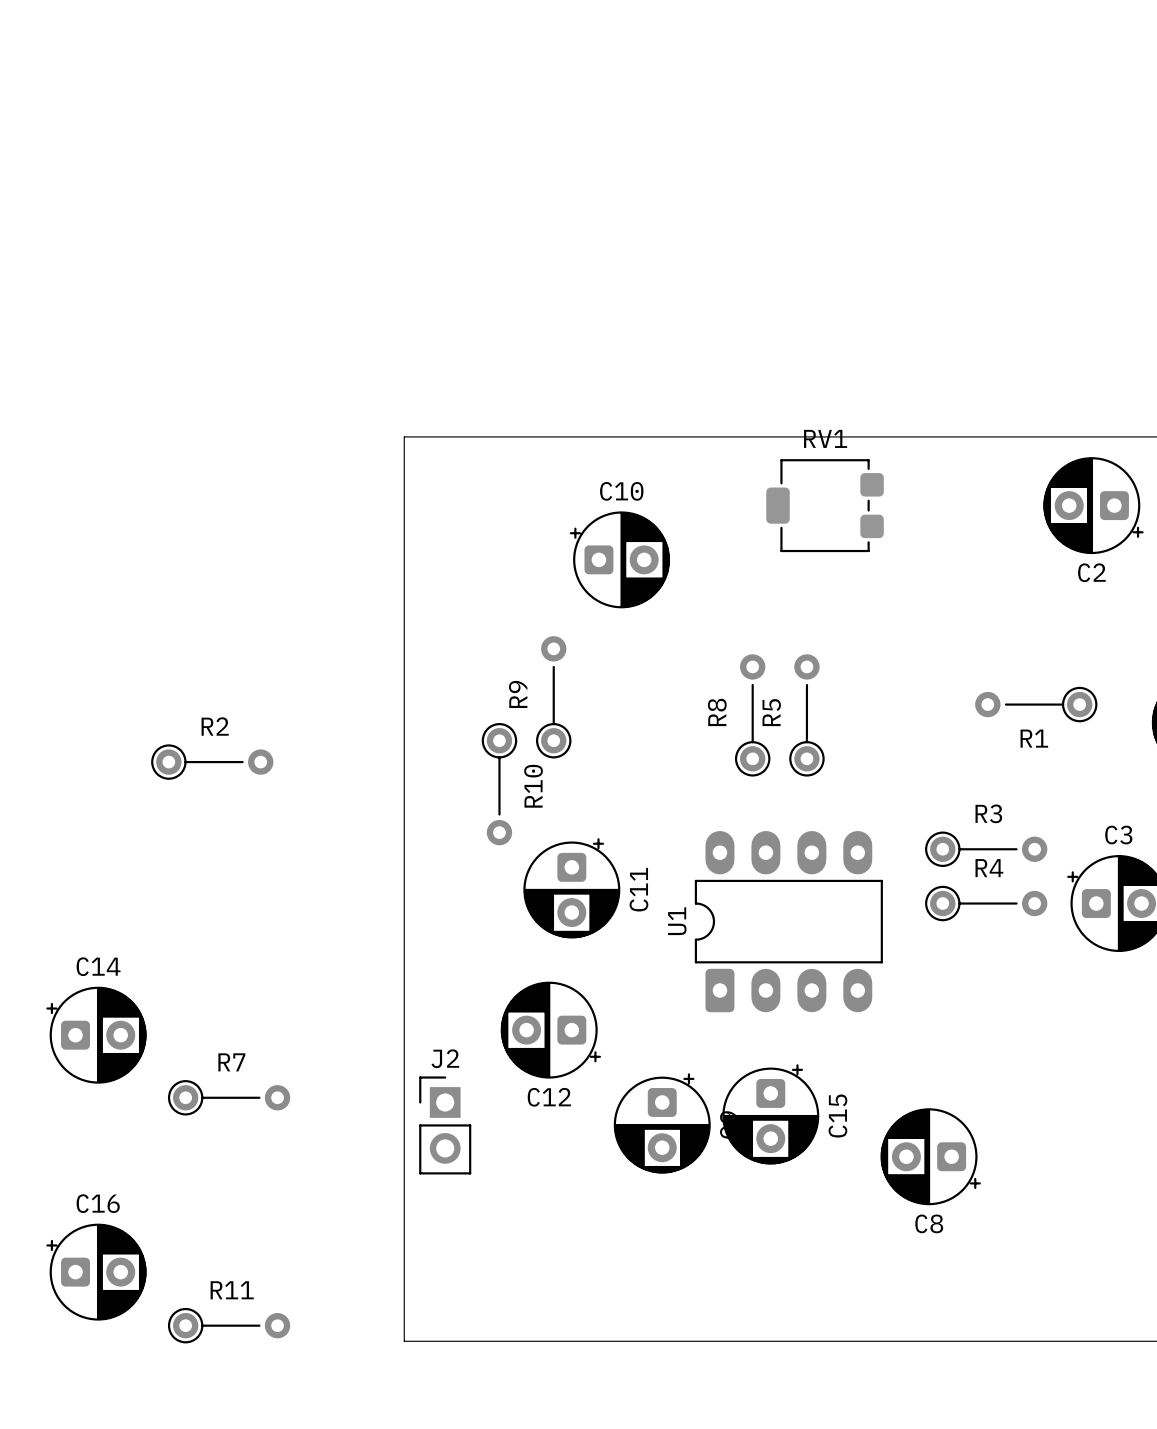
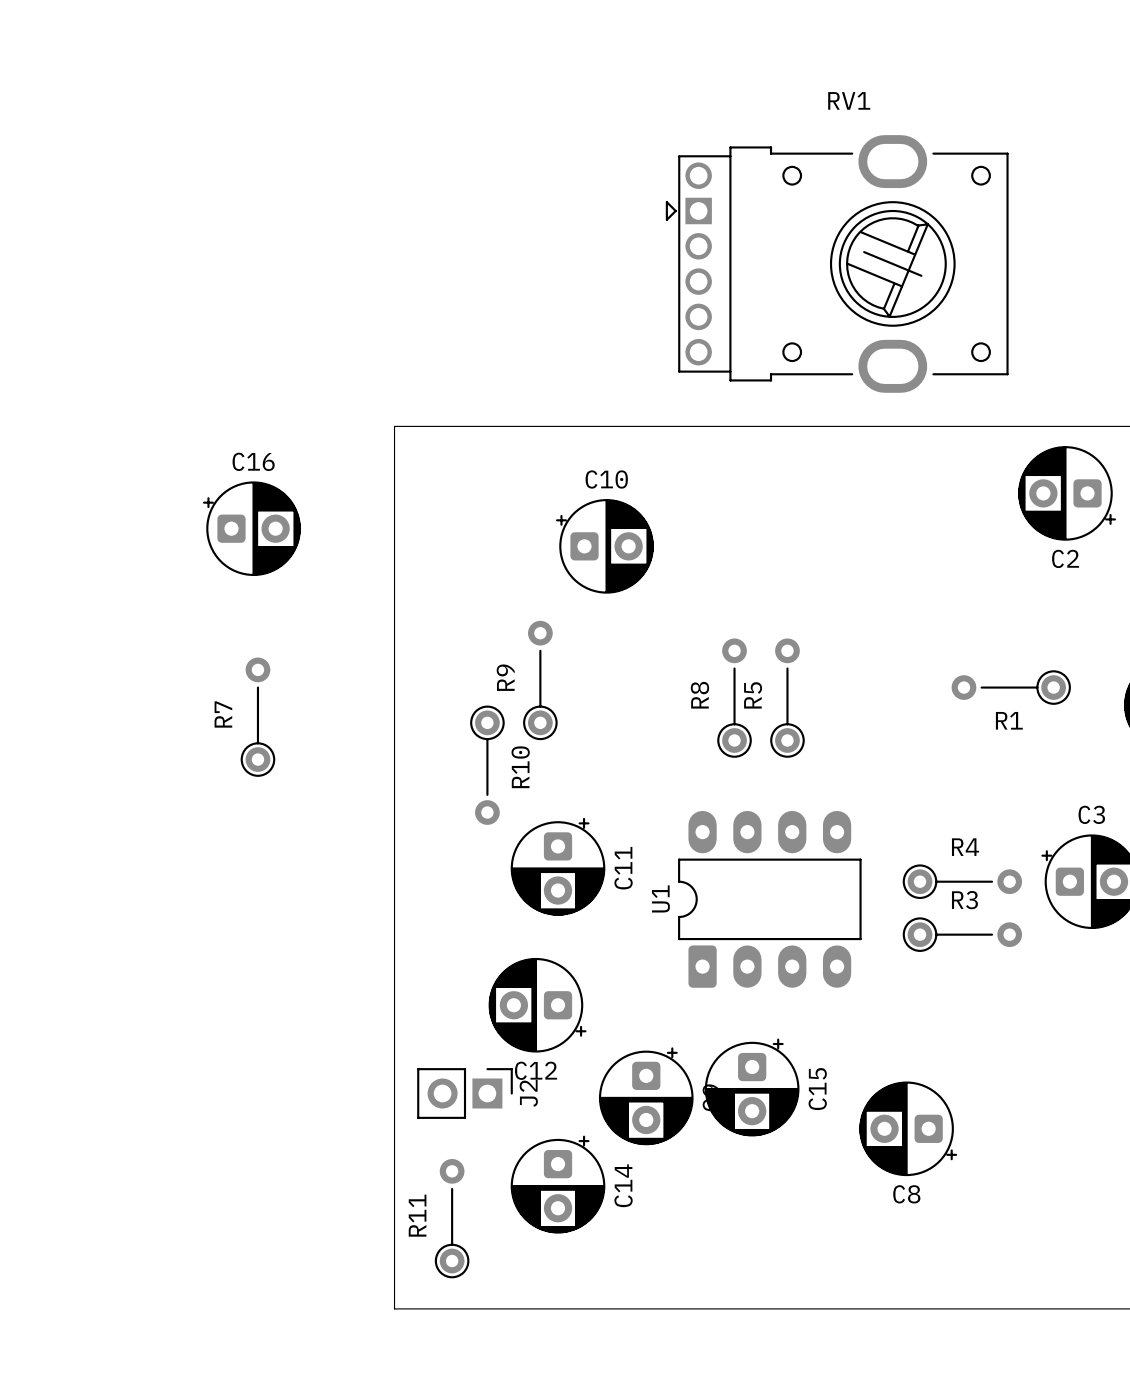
RV1 name position: RV1 (825, 438) -> RV1 (849, 100)
RV1 footprint: [766, 459, 884, 553] -> [665, 135, 1009, 393]
R2: (212, 762) -> none
R3 position: (986, 849) -> (962, 934)
C14 rotation: 0° (96, 1035) -> 90° clockwise (558, 1184)
C14 position: (96, 1035) -> (558, 1184)
R7 rotation: 0° (229, 1097) -> 90° counterclockwise (257, 717)
R7 position: (229, 1097) -> (257, 717)
J2 rotation: 0° (445, 1125) -> 90° clockwise (465, 1093)
C16 position: (96, 1272) -> (251, 528)
R11 rotation: 0° (229, 1325) -> 90° counterclockwise (452, 1218)
R11 position: (229, 1325) -> (452, 1218)

